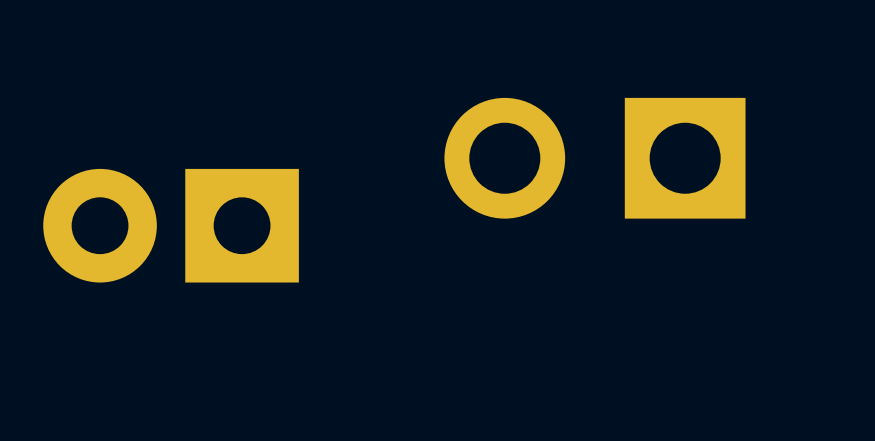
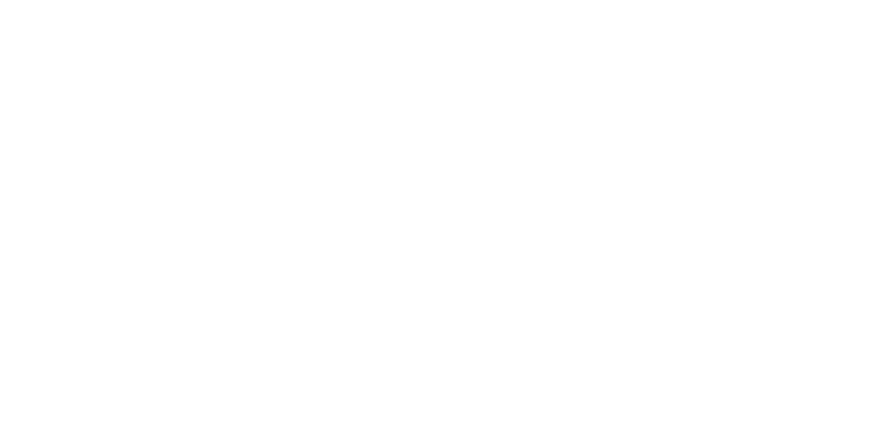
part: (594, 158) -> none
part: (171, 225) -> none

